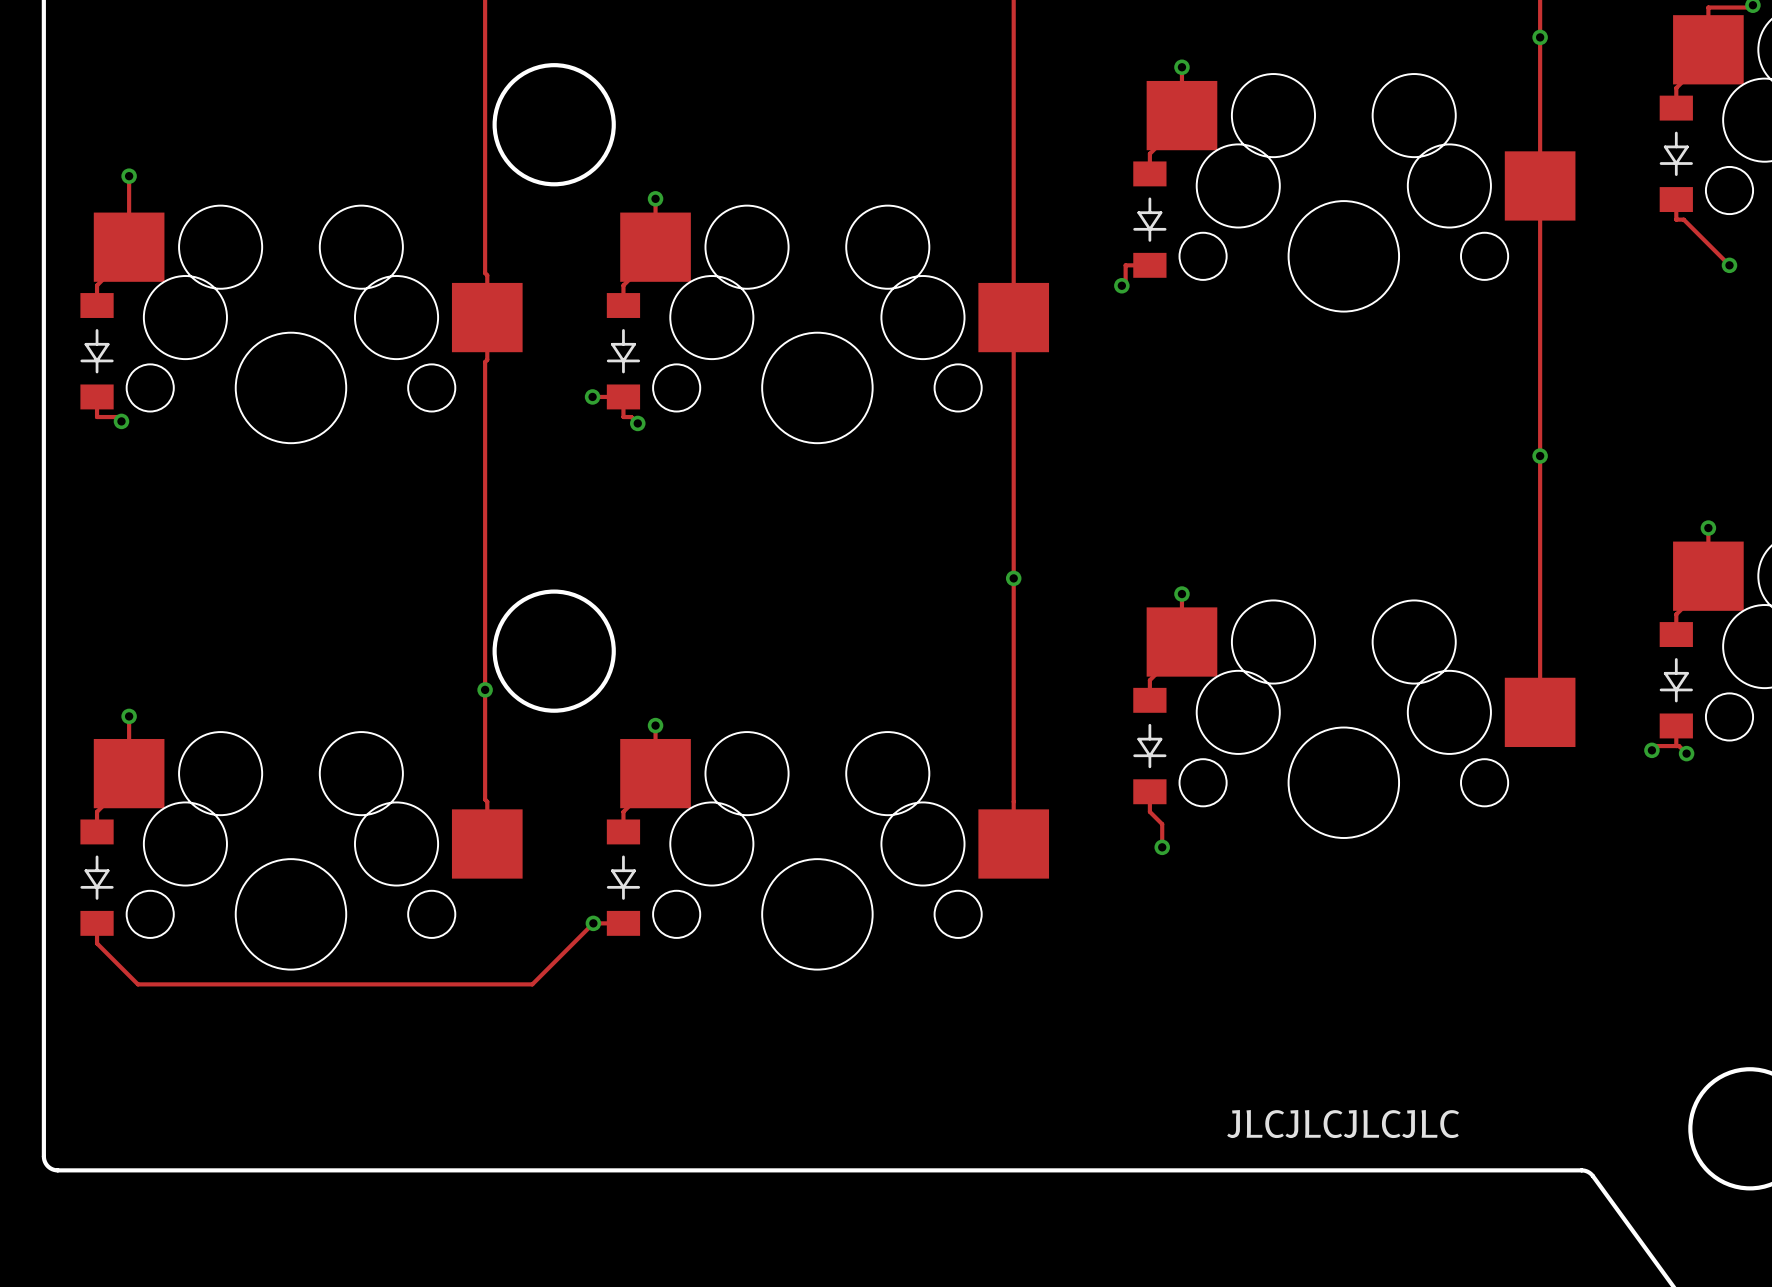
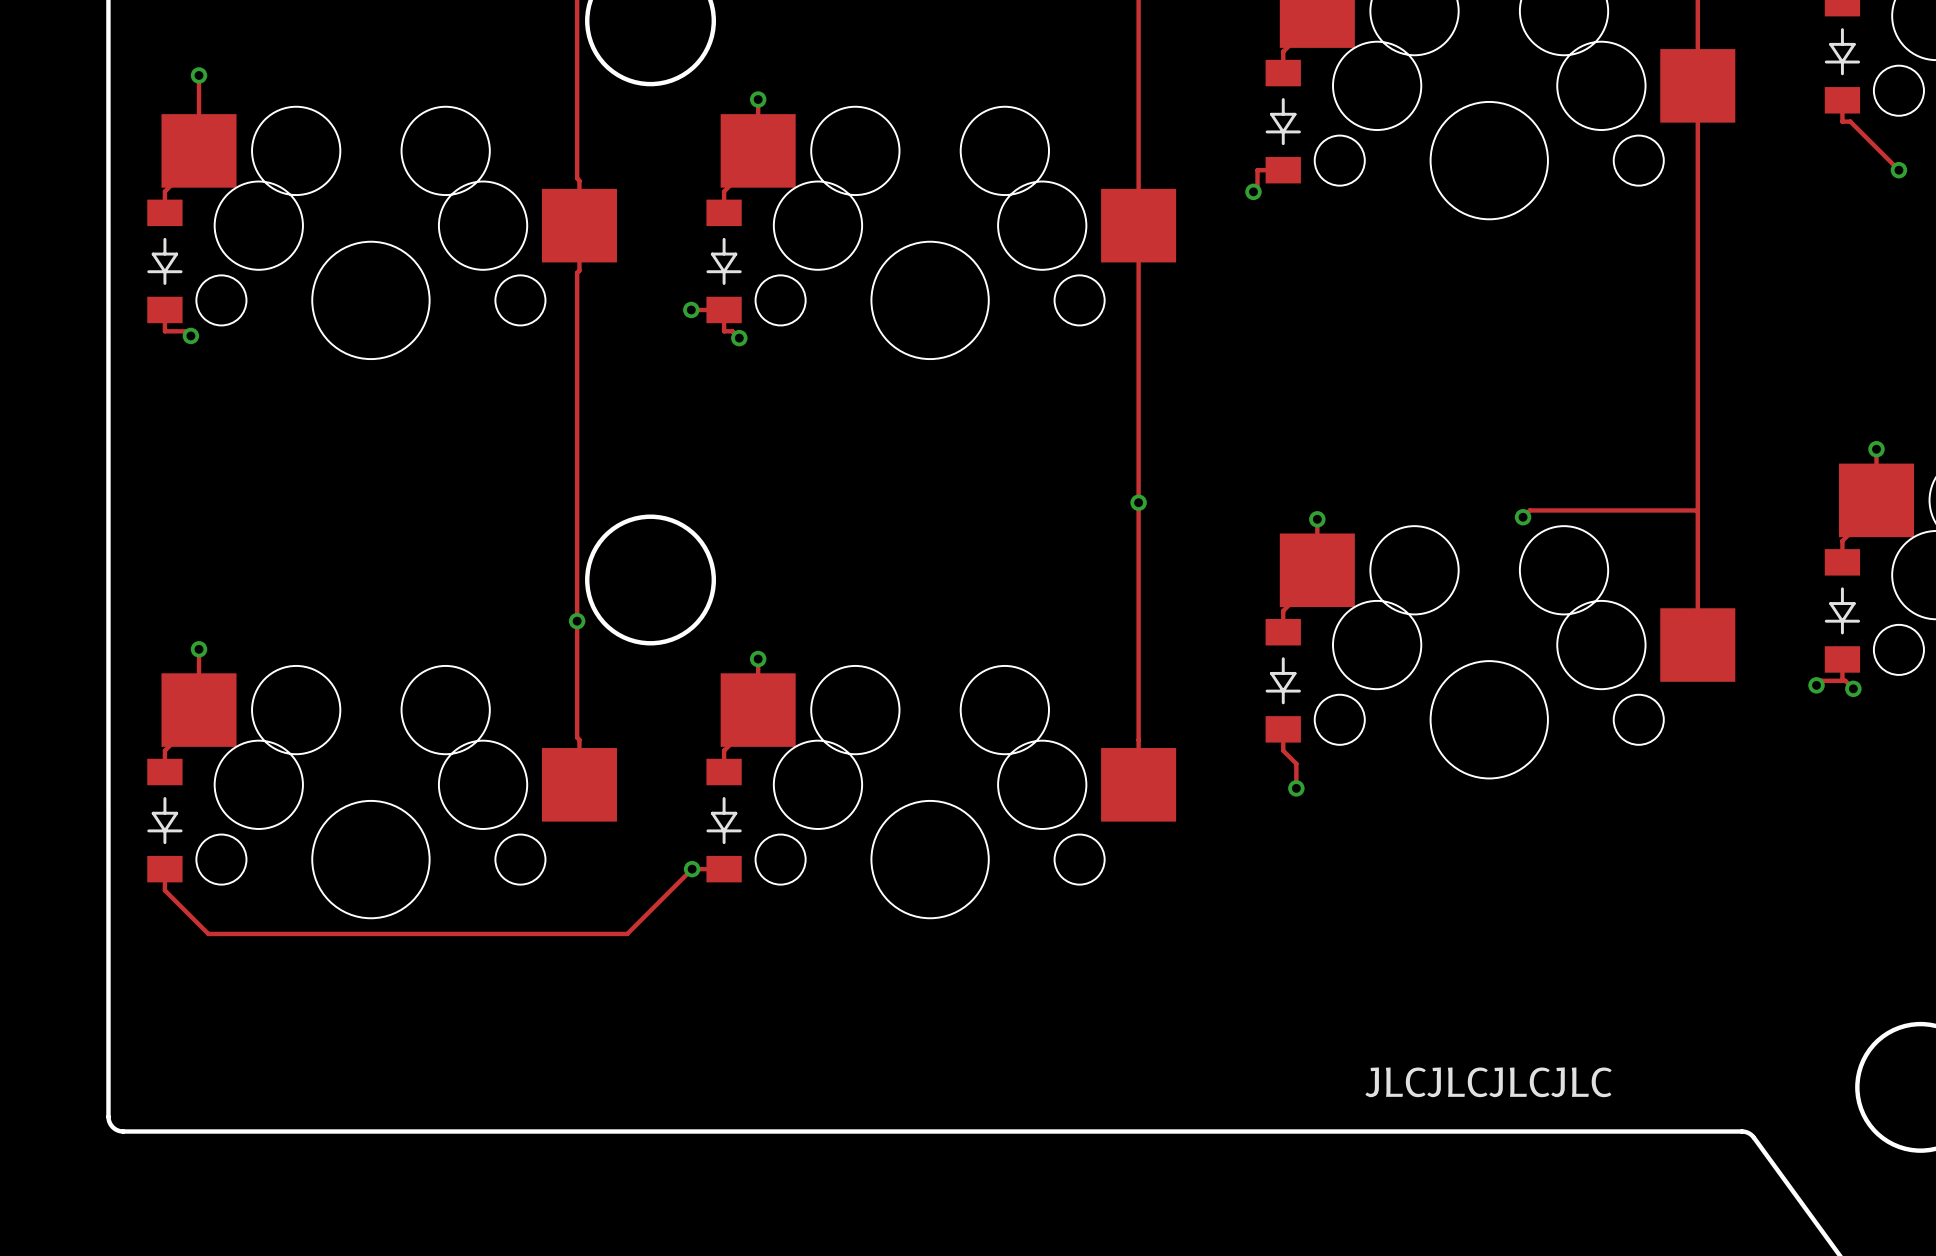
via: (1540, 456) -> none
track: none -> (1697, 510) (1529, 510) (1523, 517)
via: none -> (1523, 517)

